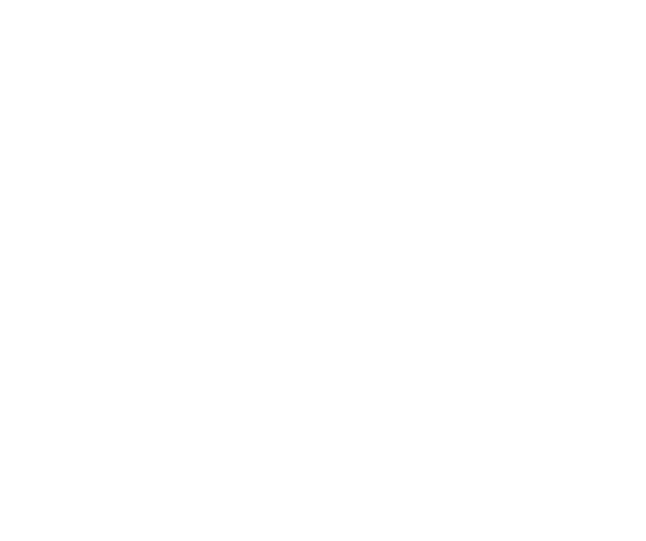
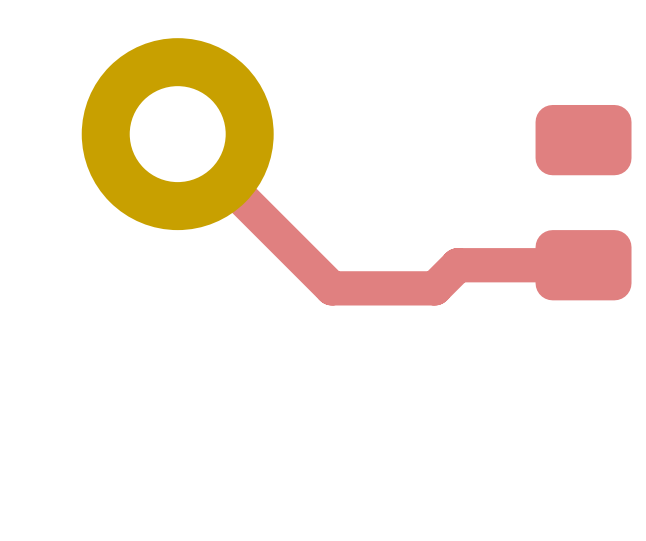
top track: none -> (177, 134) (331, 288) (434, 288) (457, 265) (583, 265)
part: none -> (177, 134)
part: none -> (583, 202)

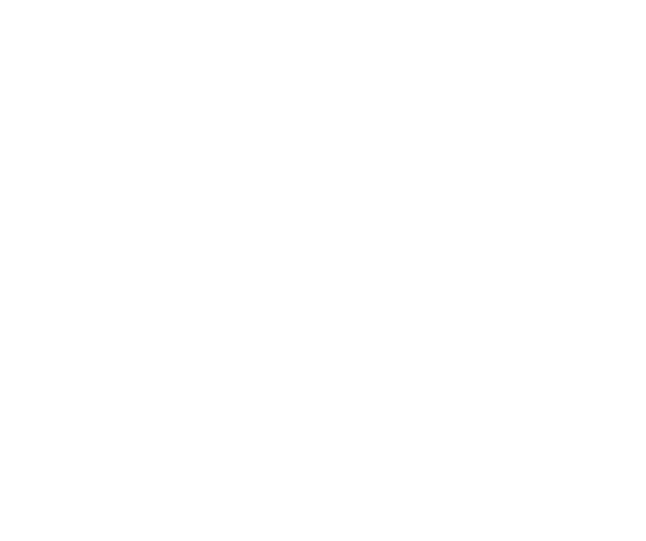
top track: (177, 134) (331, 288) (434, 288) (457, 265) (583, 265) -> none
part: (177, 134) -> none
part: (583, 202) -> none

